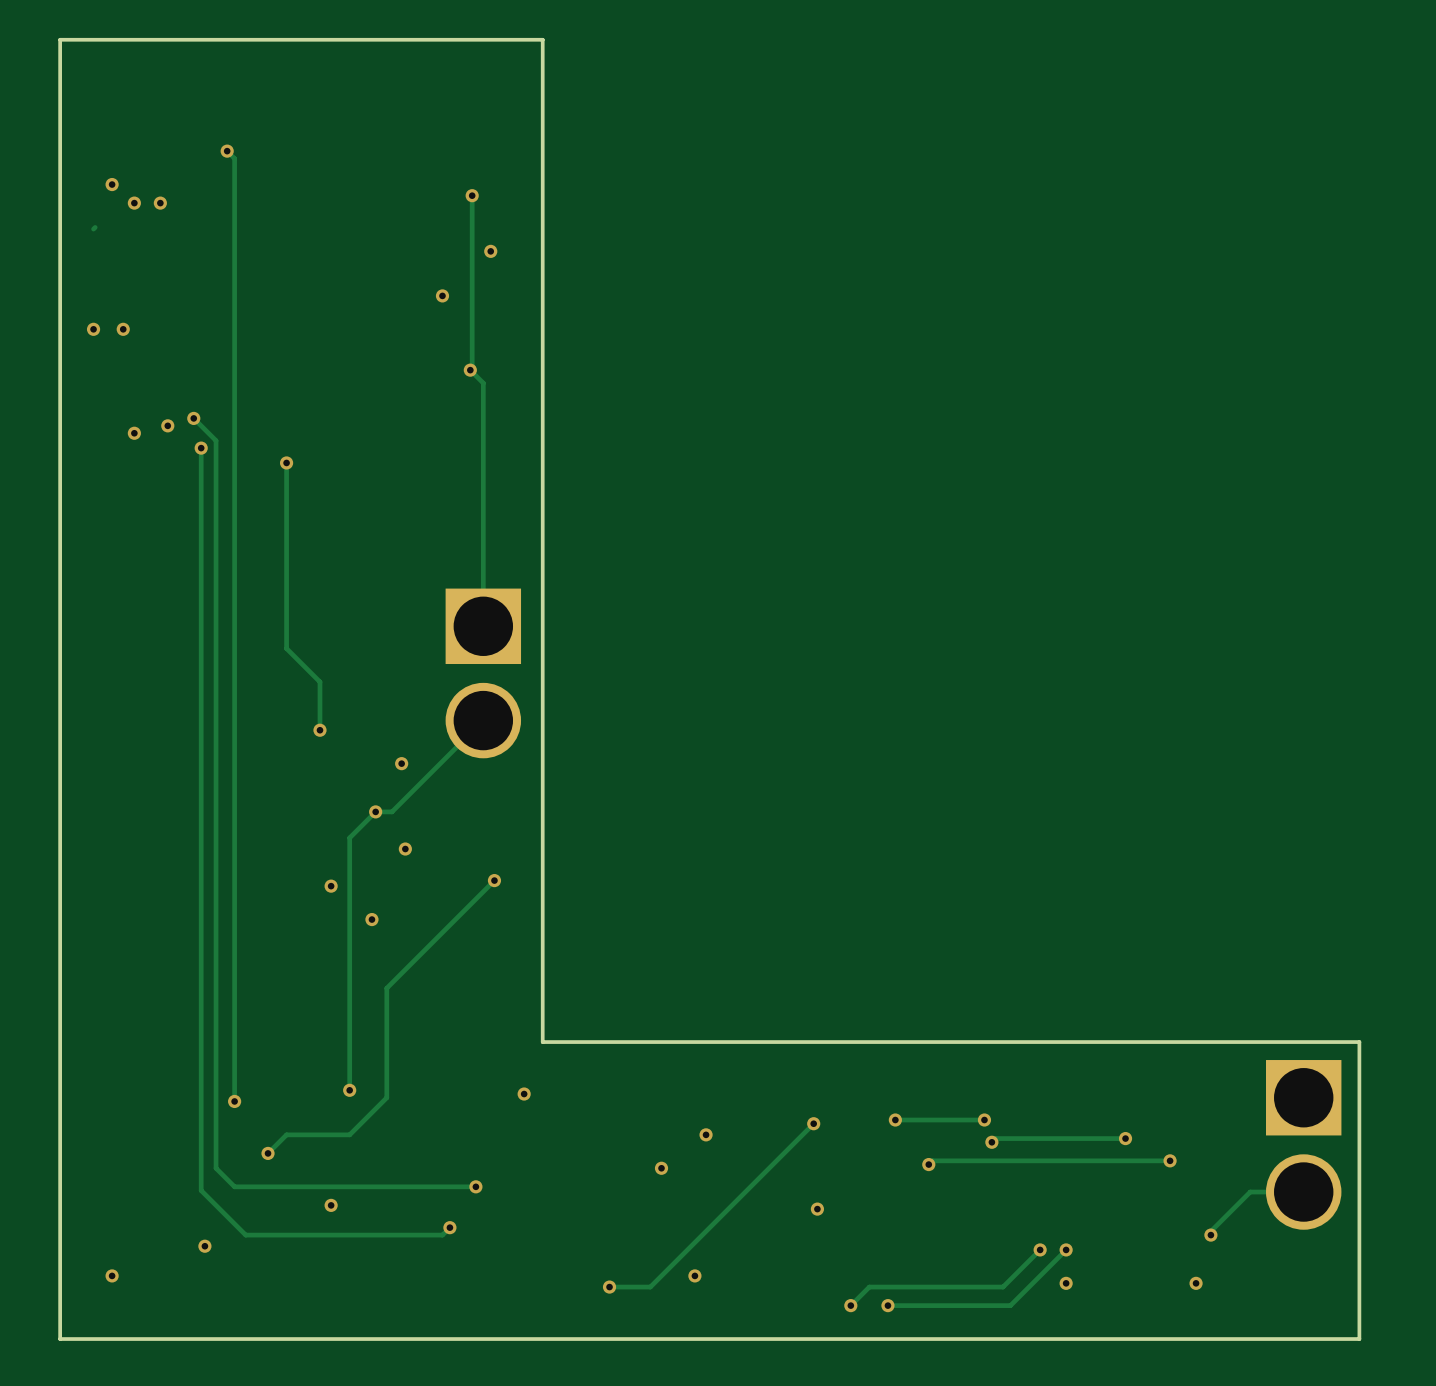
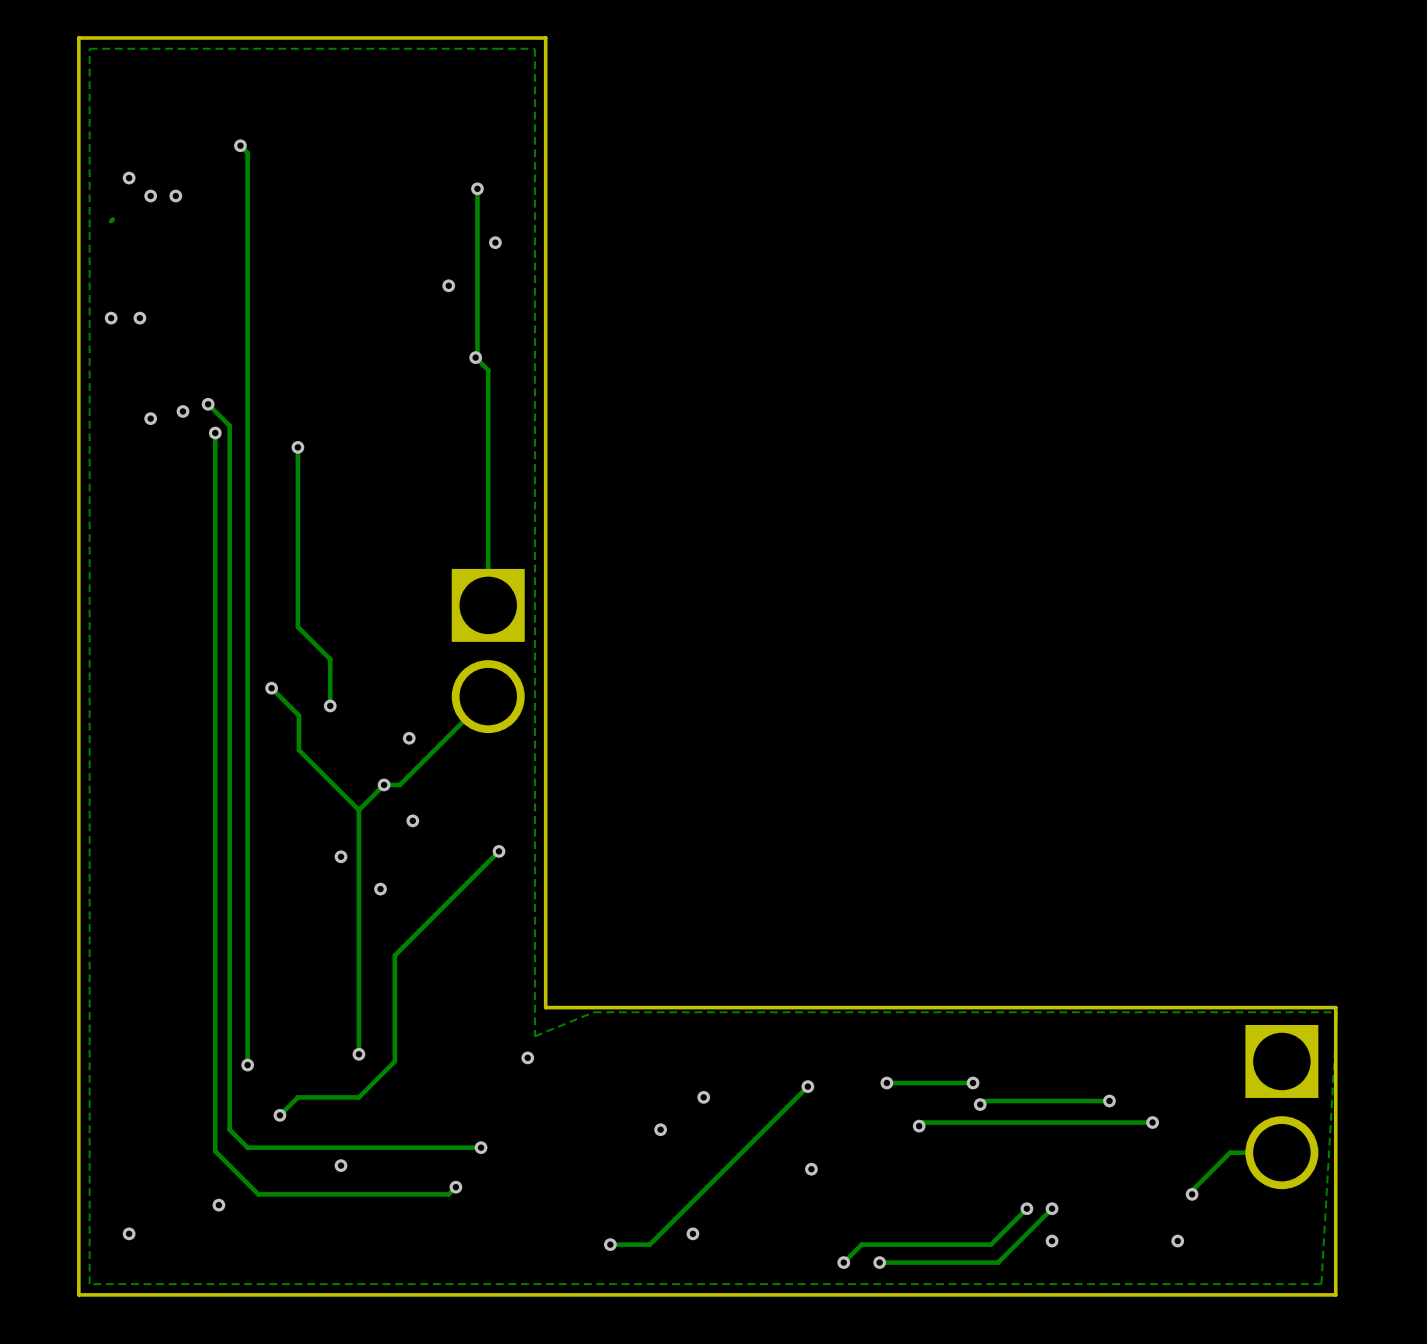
zone outline: none -> (534, 48) (534, 1036) (593, 1012) (1337, 1012) (1321, 1284) (89, 1284) (89, 48) (534, 48)
track: none -> (271, 688) (298, 715) (298, 750) (358, 810)
via: none -> (271, 688)

